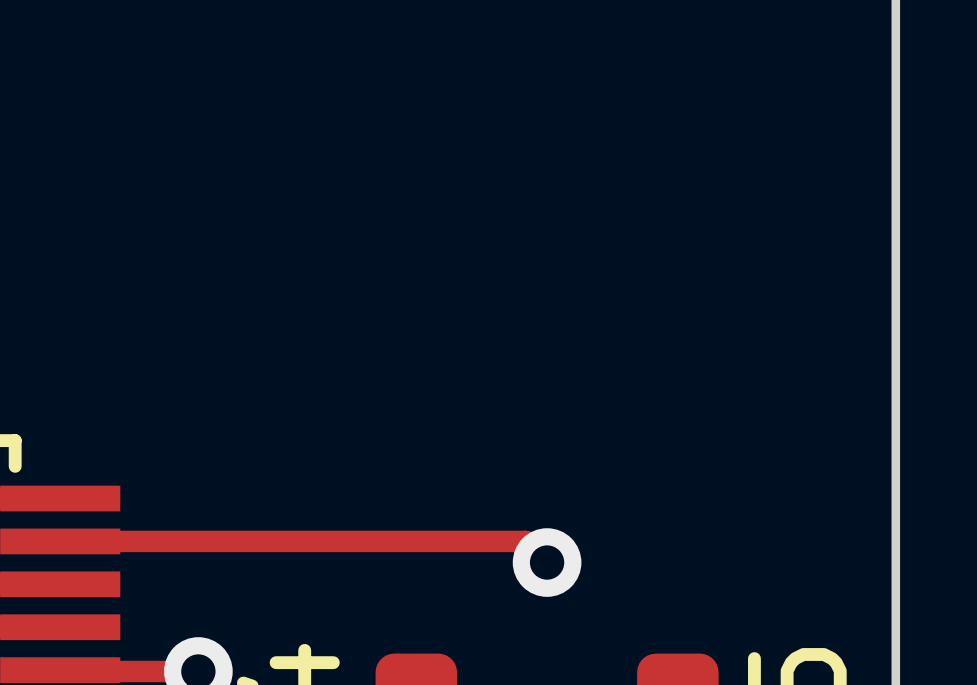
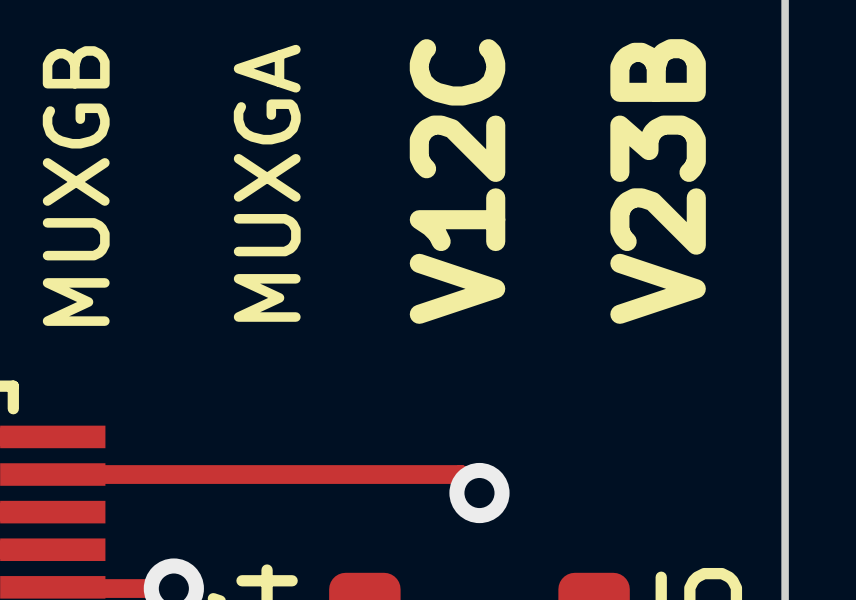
text: none -> V12C (457, 181)
text: none -> V23B (658, 181)
text: none -> MUXGA (267, 183)
text: none -> MUXGB (76, 186)

